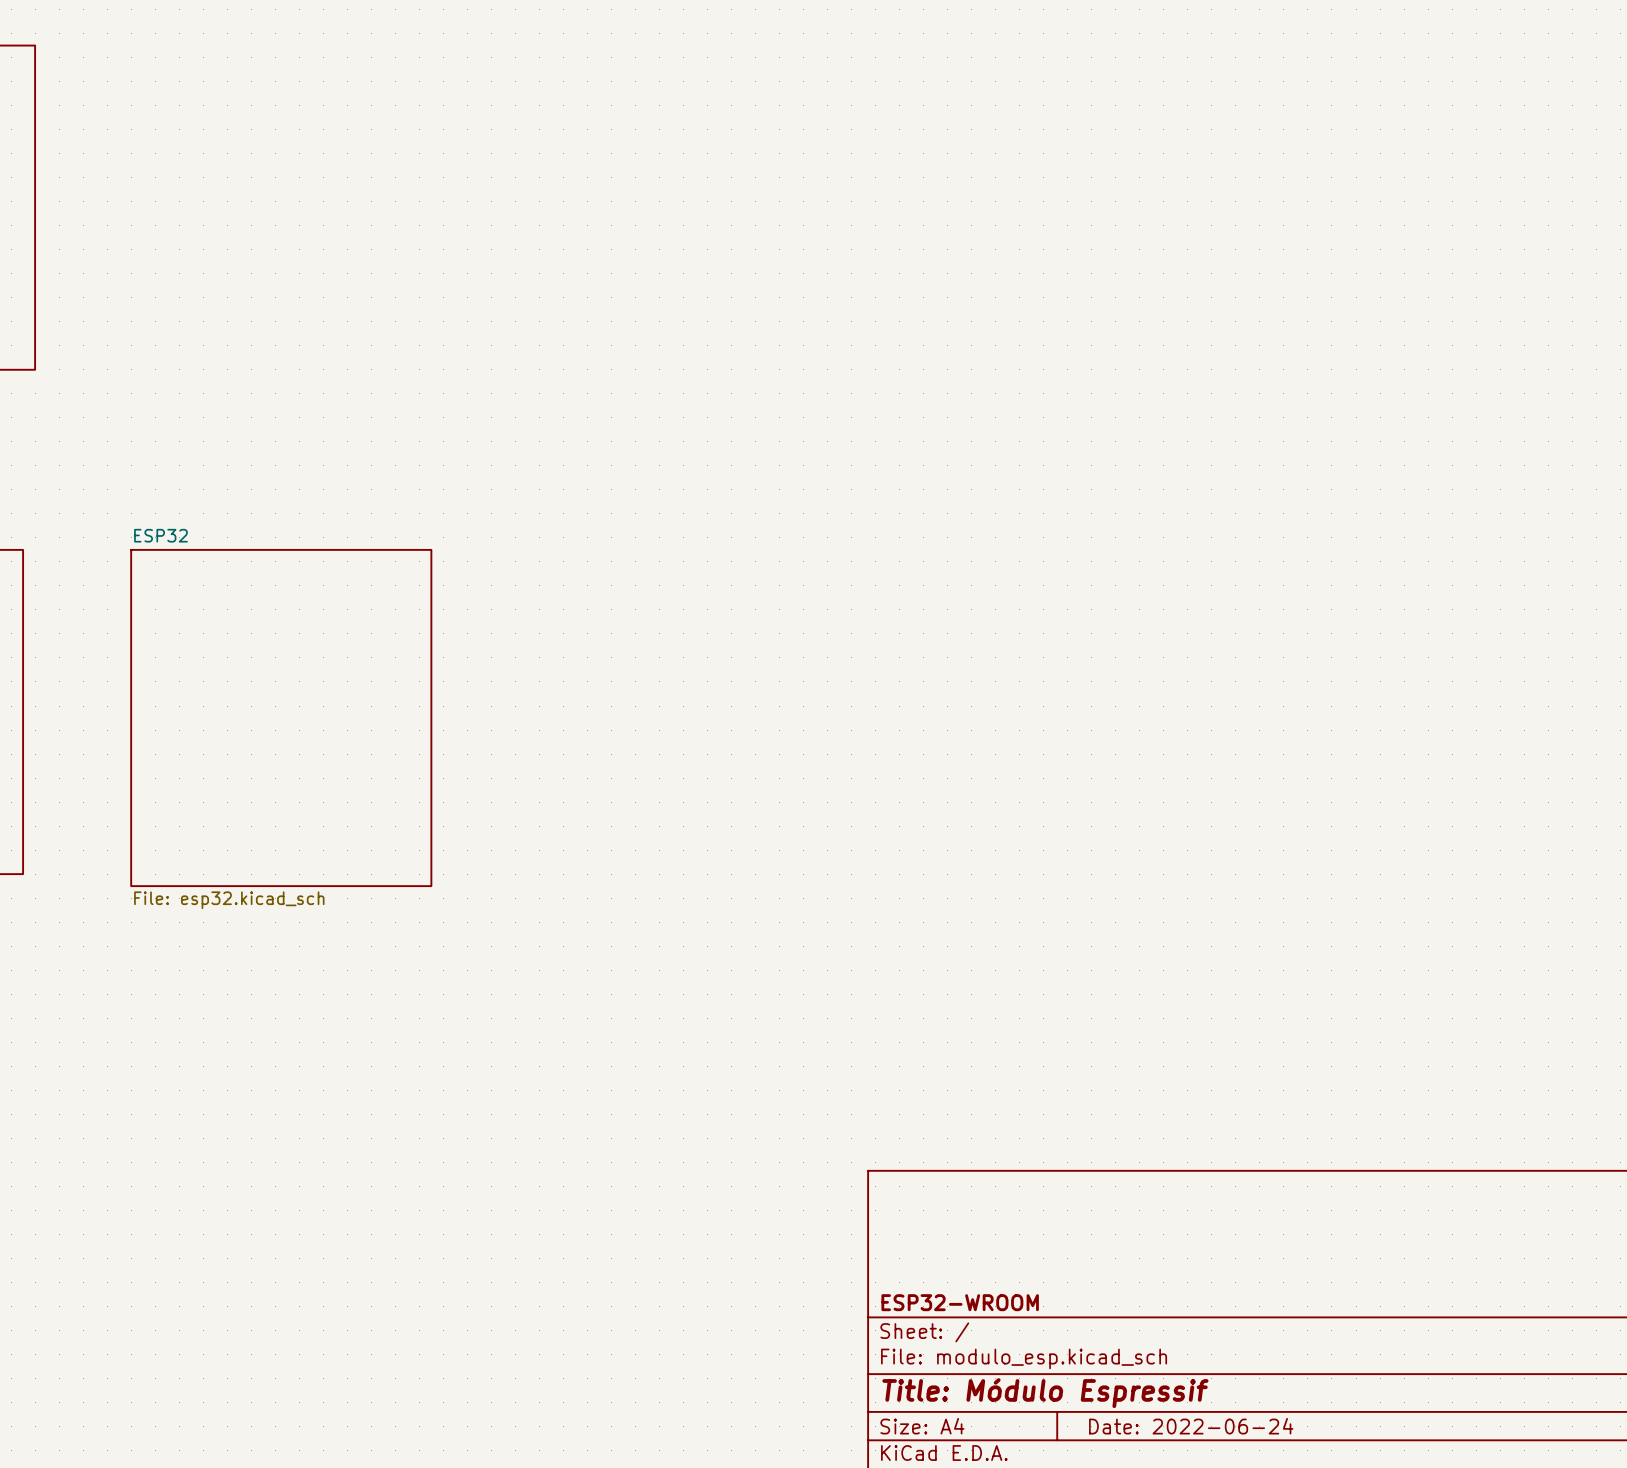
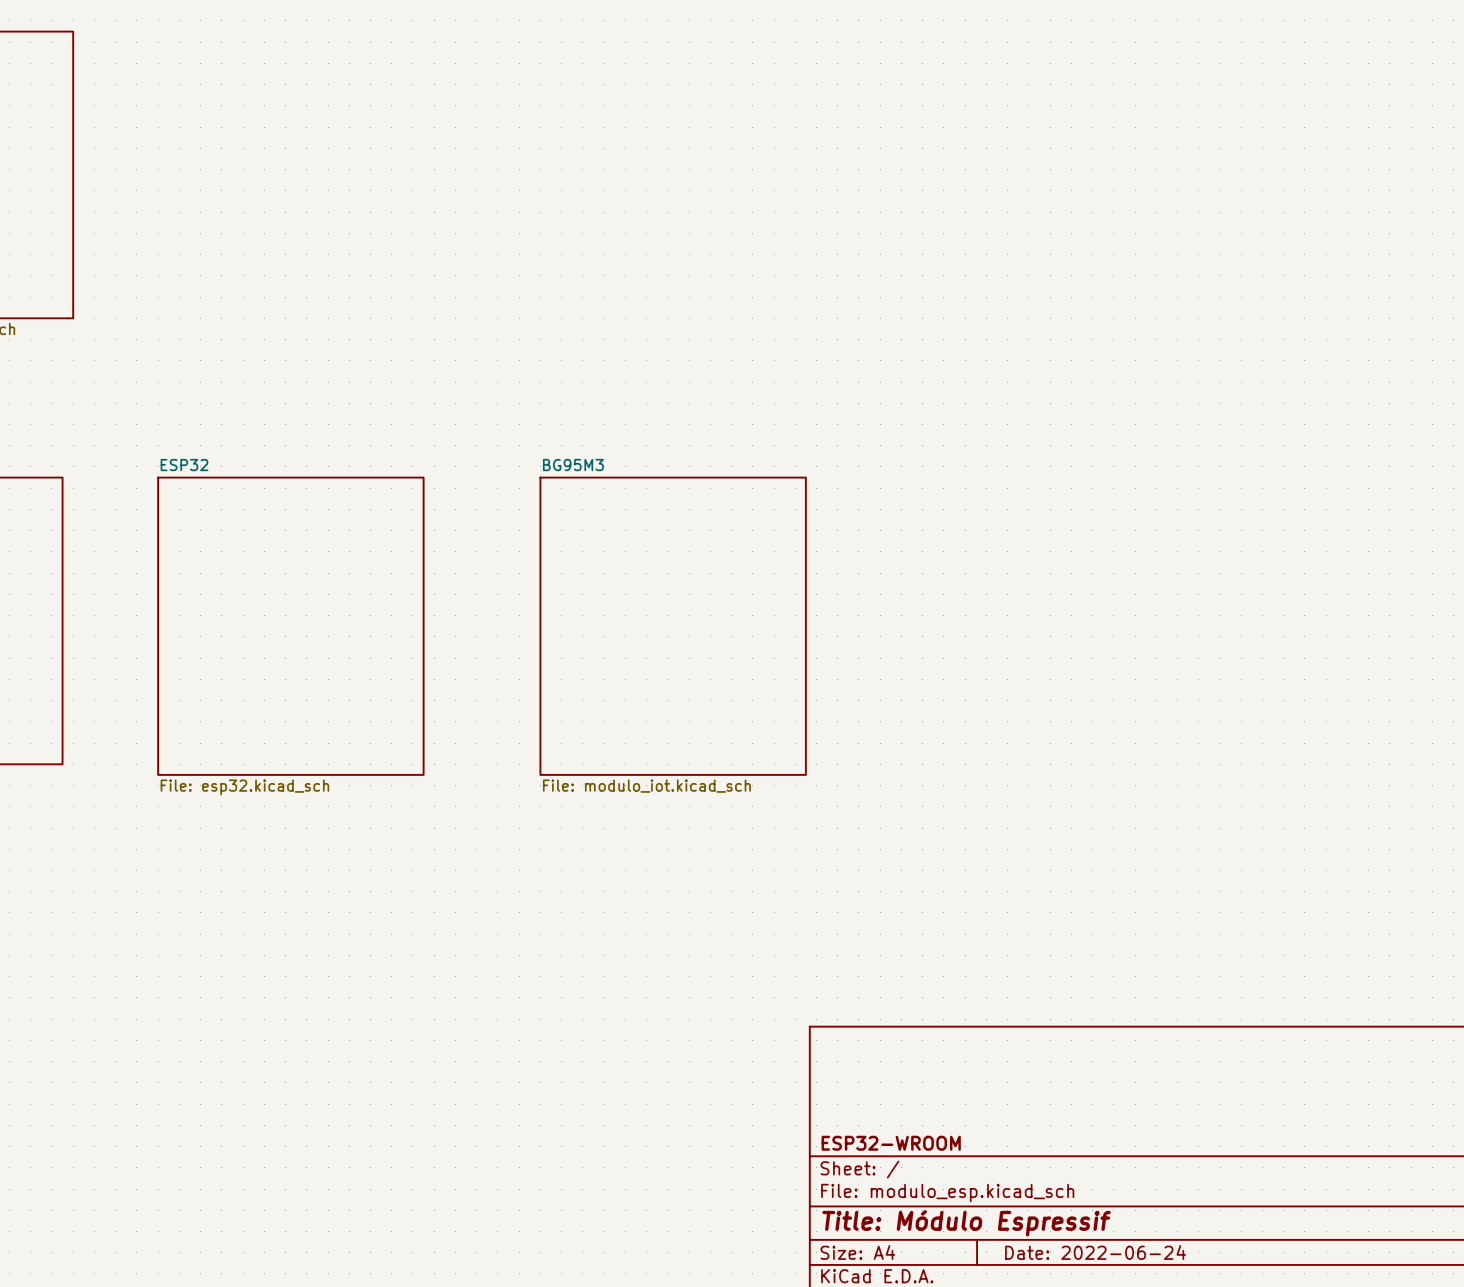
sheet BG95M3: none -> File: modulo_iot.kicad_sch (673, 626)

